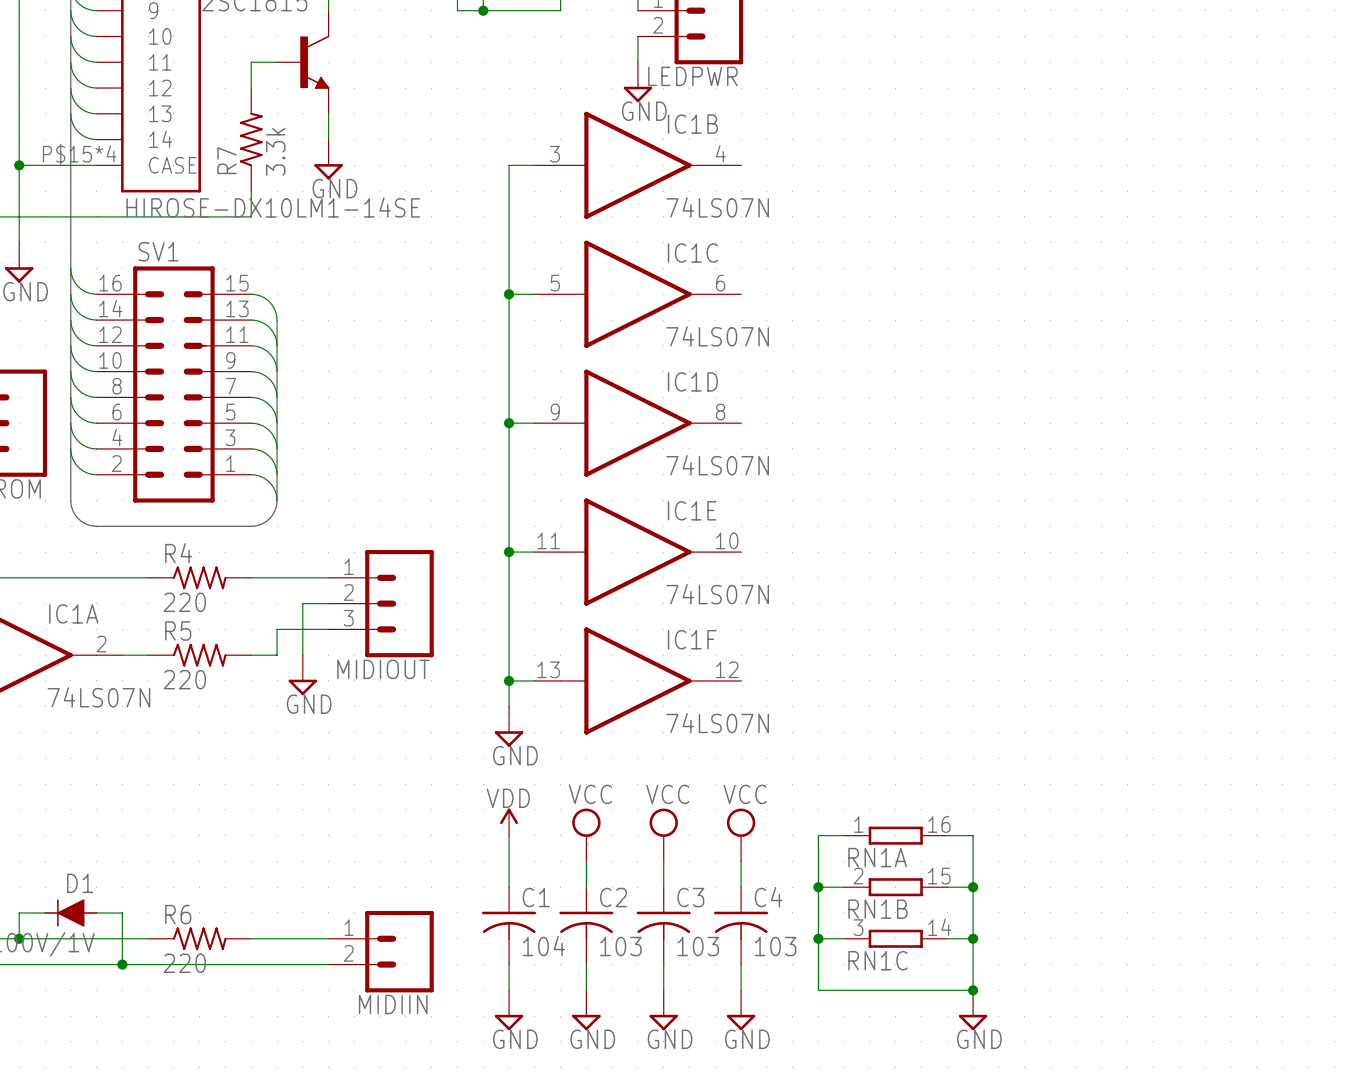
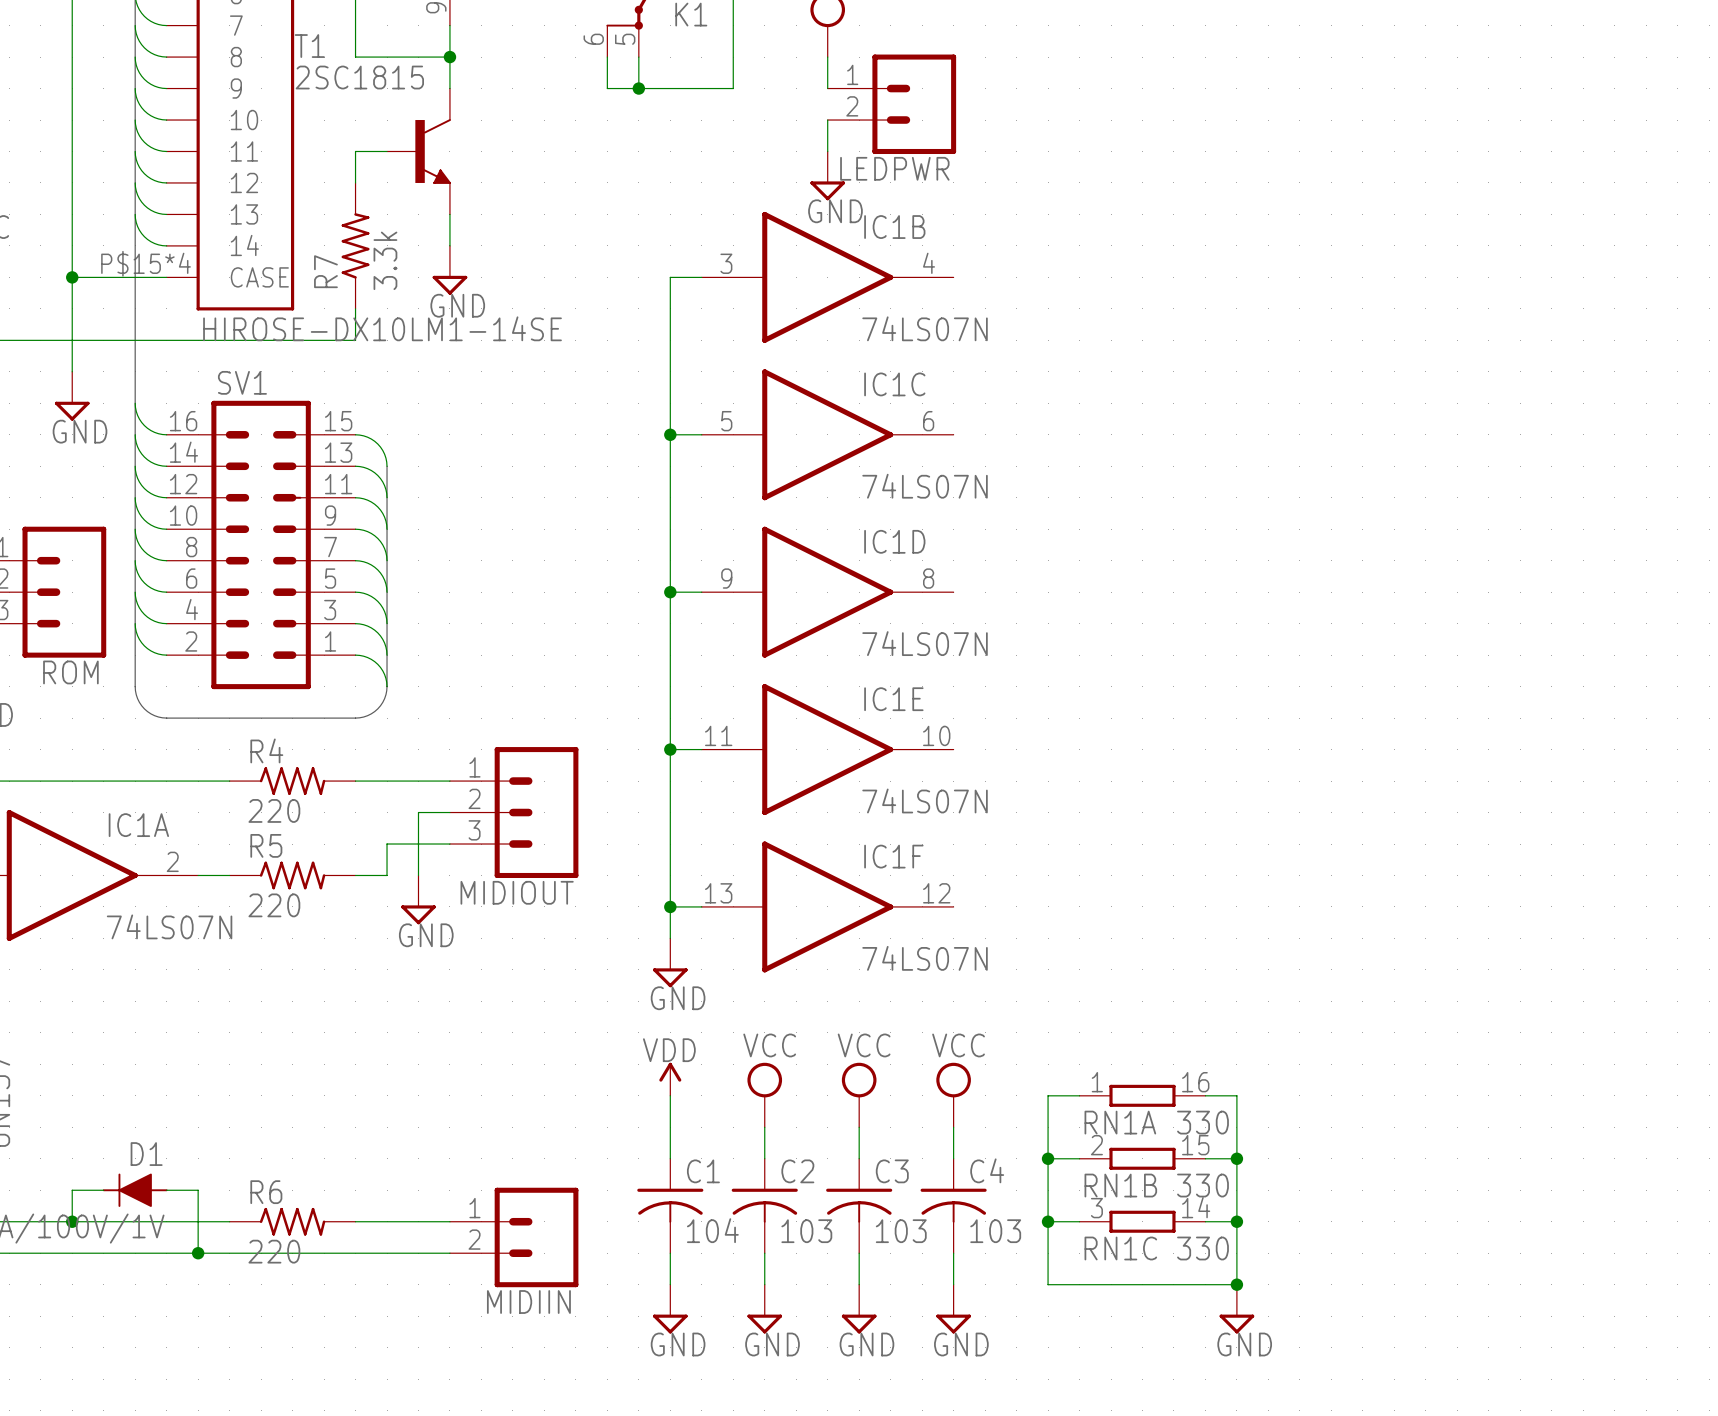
RN1A value: none -> 330 (1202, 1122)
RN1B value: none -> 330 (1202, 1185)
RN1C value: none -> 330 (1202, 1248)

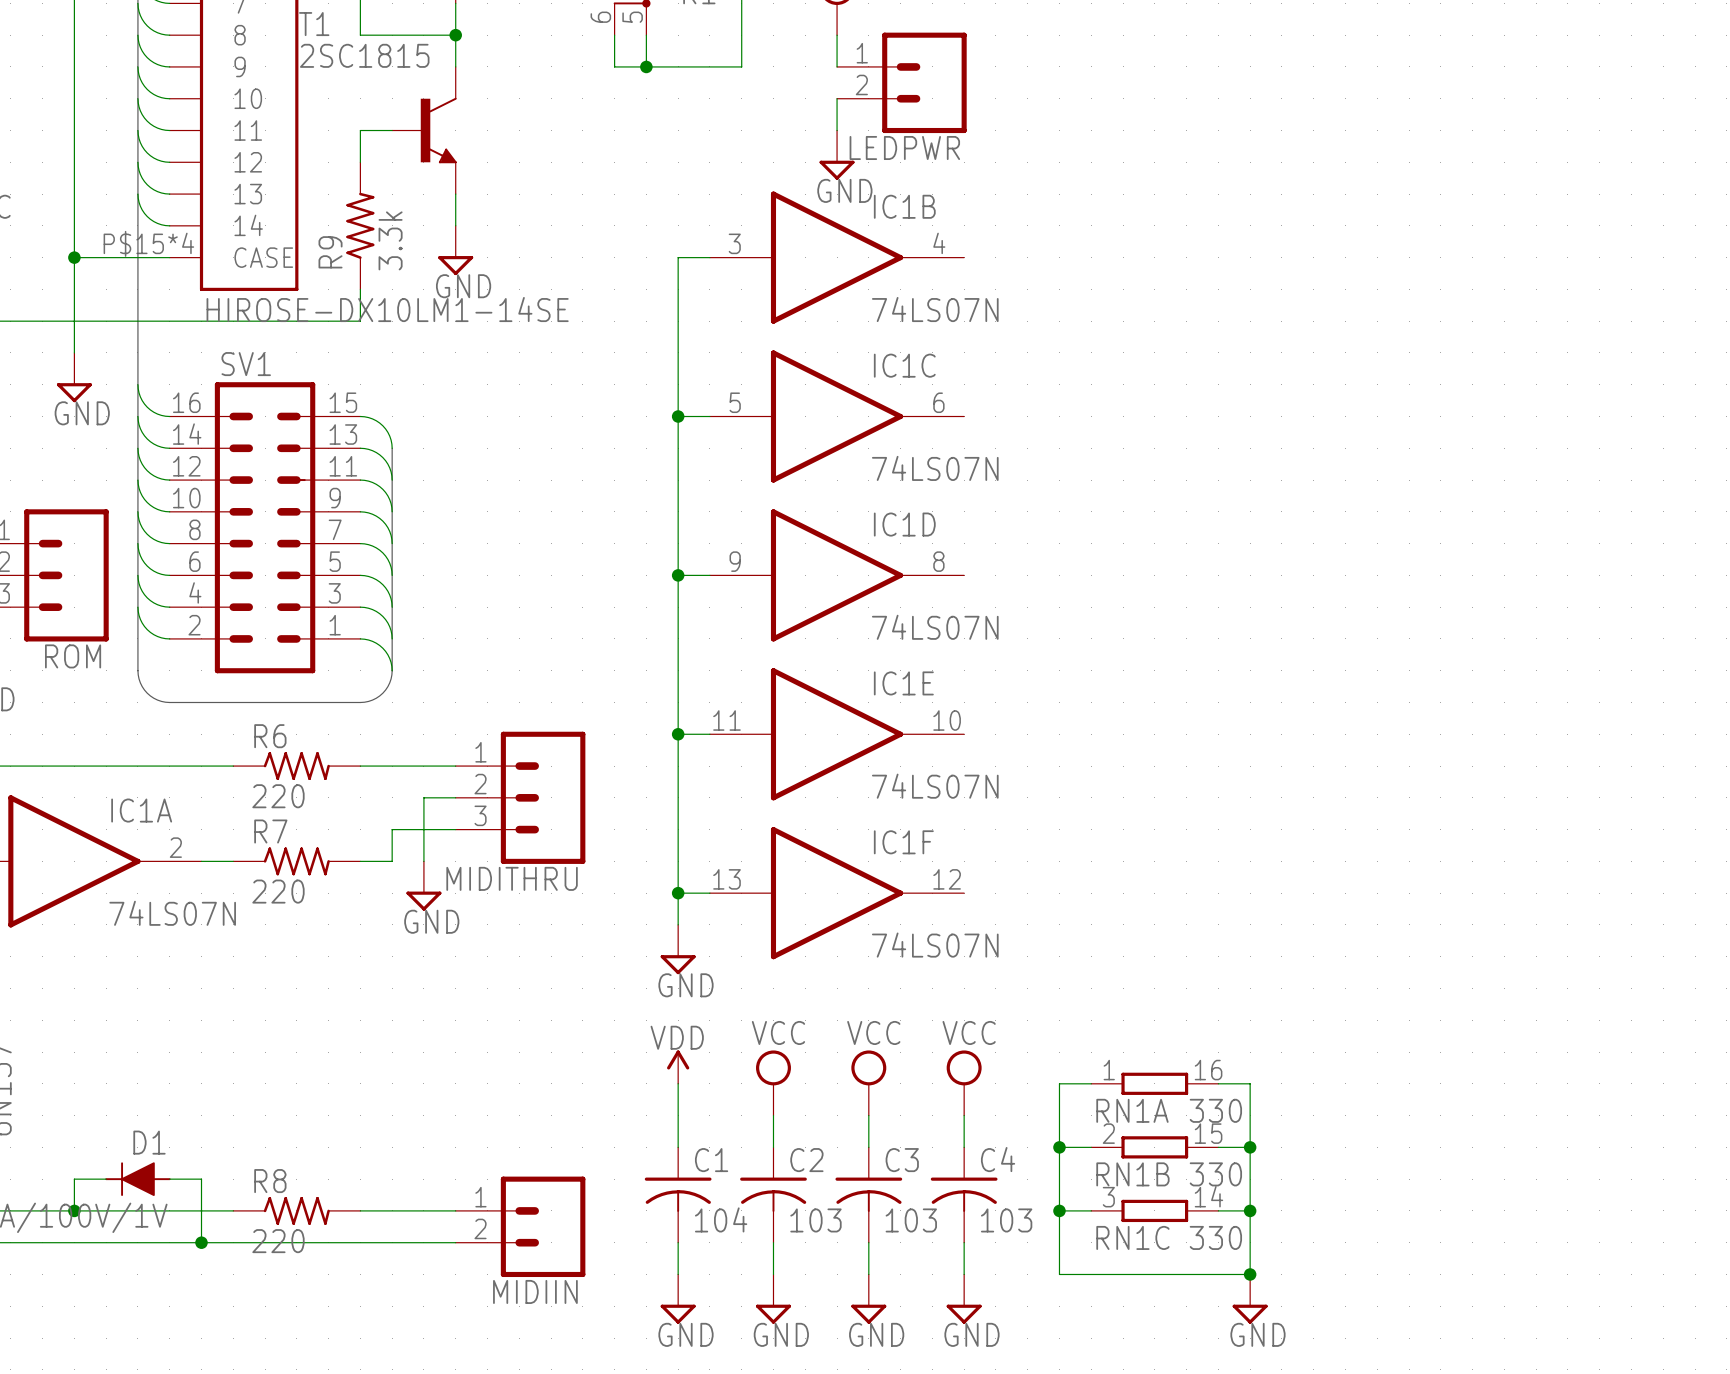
R7 name: R7 (325, 271) -> R9 (330, 252)
R4 name: R4 (266, 750) -> R6 (270, 736)
R5 name: R5 (266, 845) -> R7 (270, 831)
MIDIOUT name: MIDIOUT (517, 892) -> MIDITHRU (512, 878)
R6 name: R6 (266, 1192) -> R8 (270, 1181)

